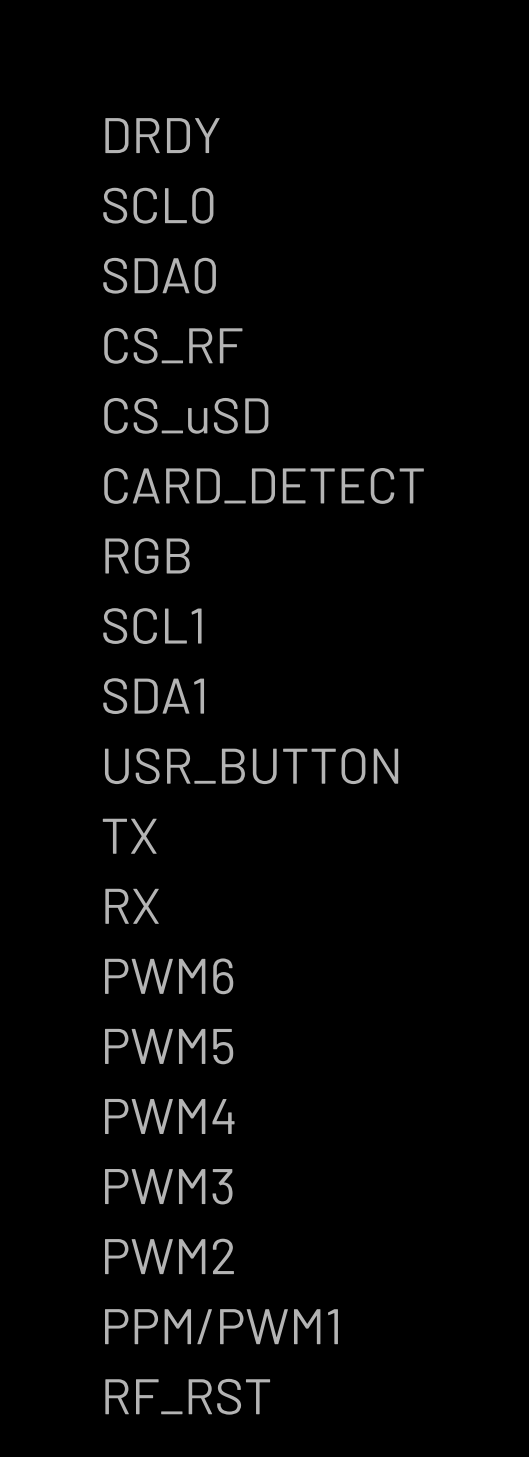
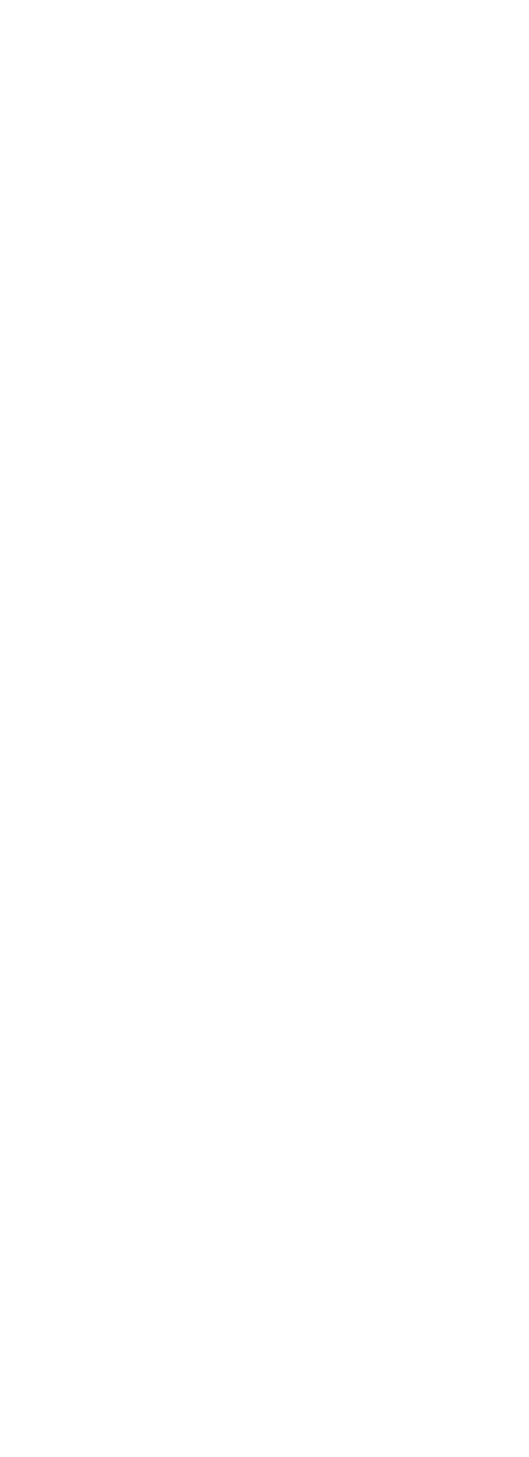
label: DRDY (162, 135) -> none
label: SCL0 (158, 205) -> none
label: SDA0 (159, 275) -> none
label: CS_RF (173, 345) -> none
label: CS_uSD (186, 415) -> none
label: CARD_DETECT (264, 485) -> none
label: RGB (147, 555) -> none
label: SCL1 (152, 626) -> none
label: SDA1 (153, 696) -> none
label: USR_BUTTON (251, 766) -> none
label: TX (129, 836) -> none
label: RX (132, 906) -> none
label: PWM6 (169, 976) -> none
label: PWM5 (169, 1046) -> none
label: PWM4 (169, 1116) -> none
label: PWM3 (168, 1186) -> none
label: PWM2 (169, 1256) -> none
label: PPM/PWM1 (221, 1326) -> none
label: RF_RST (187, 1396) -> none

